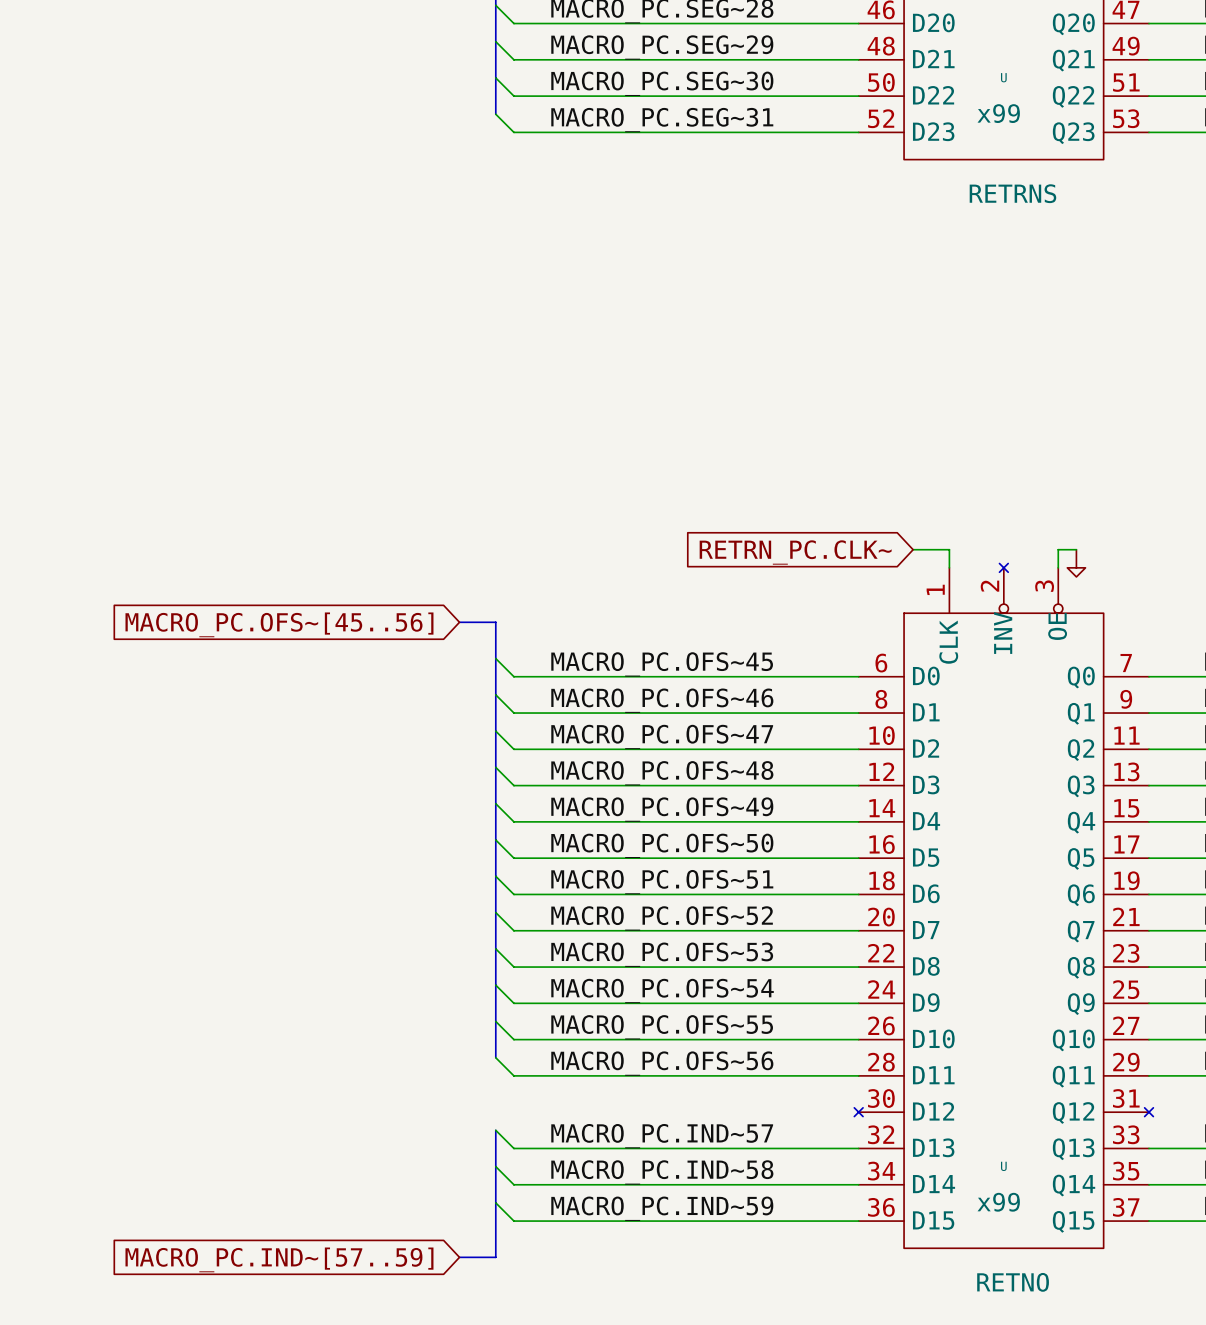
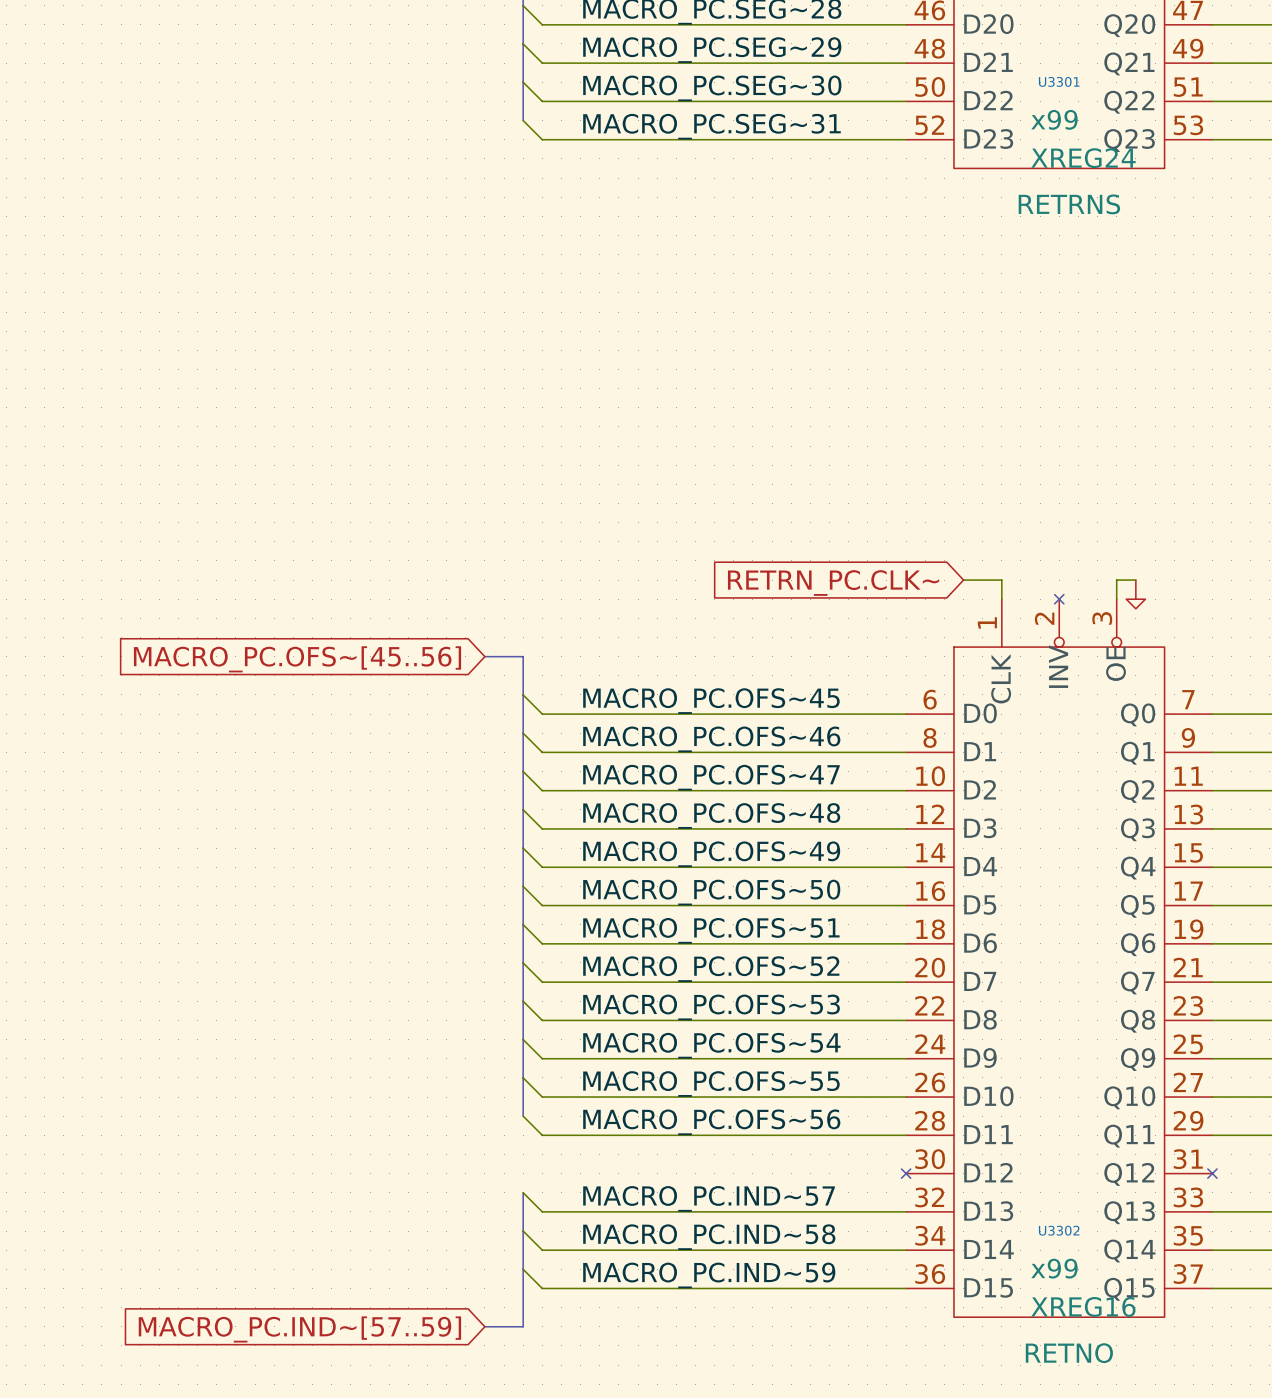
U name: U (1003, 77) -> U3301 (1059, 81)
U value: none -> XREG24 (1083, 158)
U name: U (1003, 1166) -> U3302 (1059, 1230)
U value: none -> XREG16 (1083, 1306)

